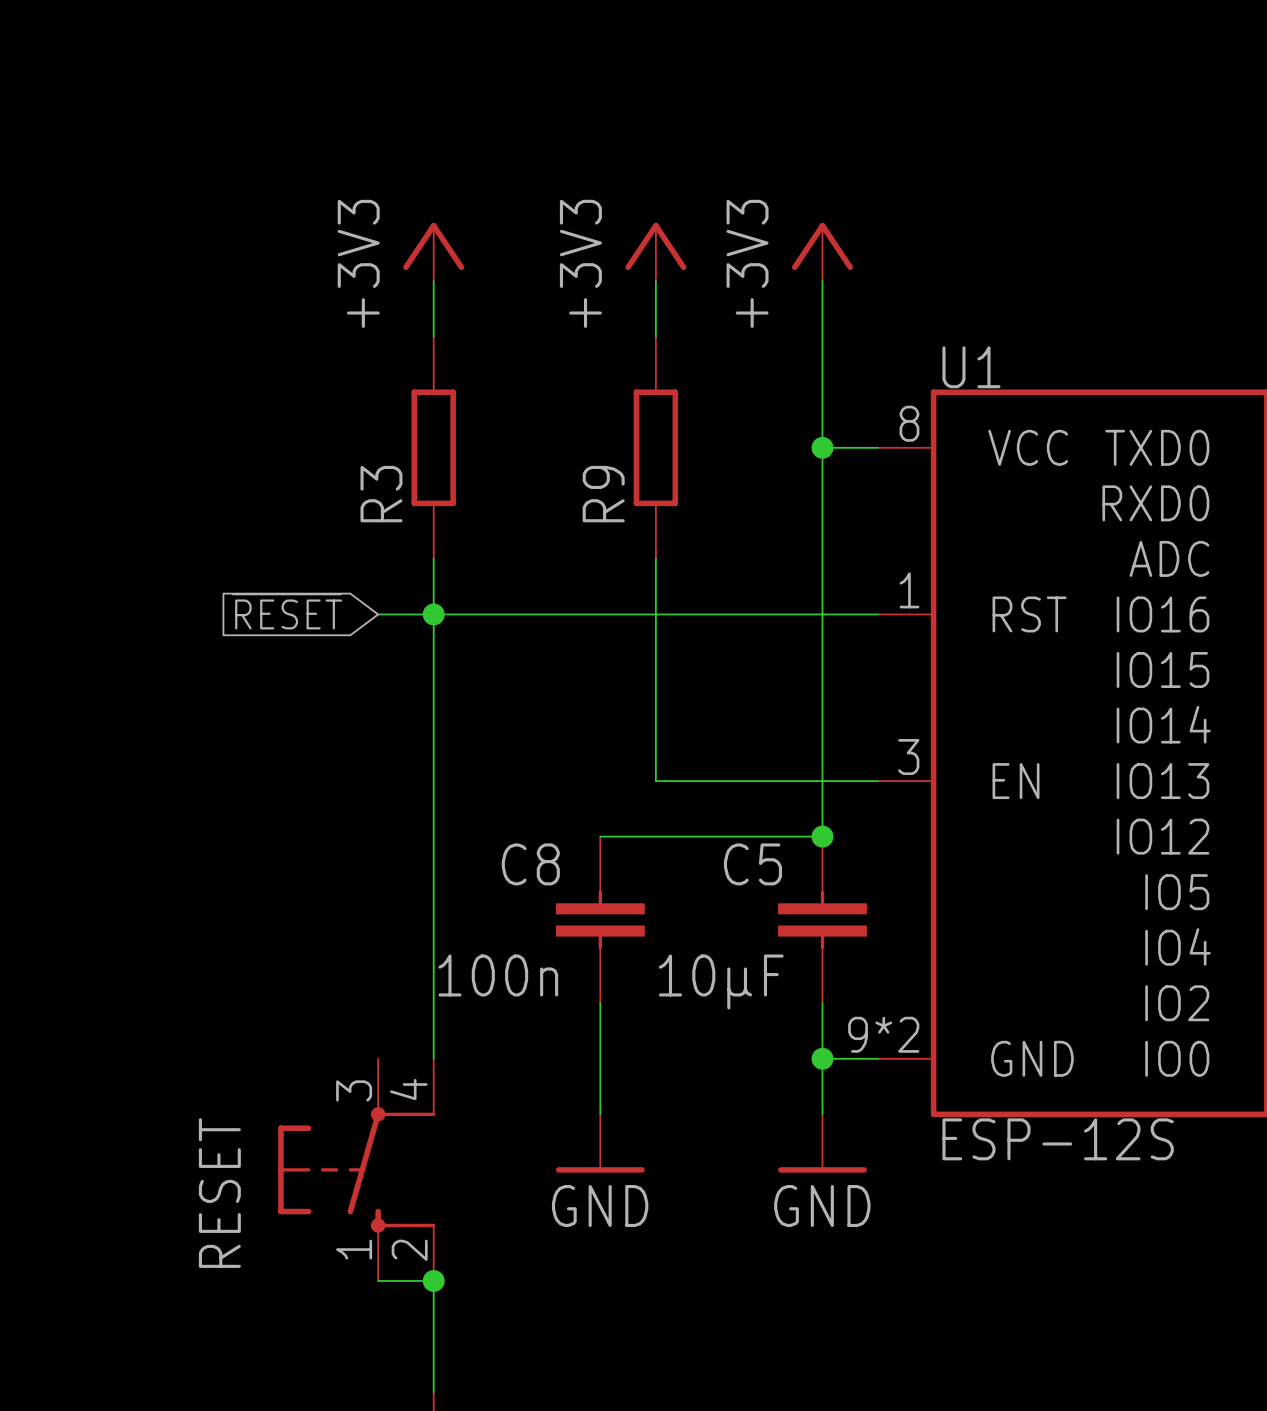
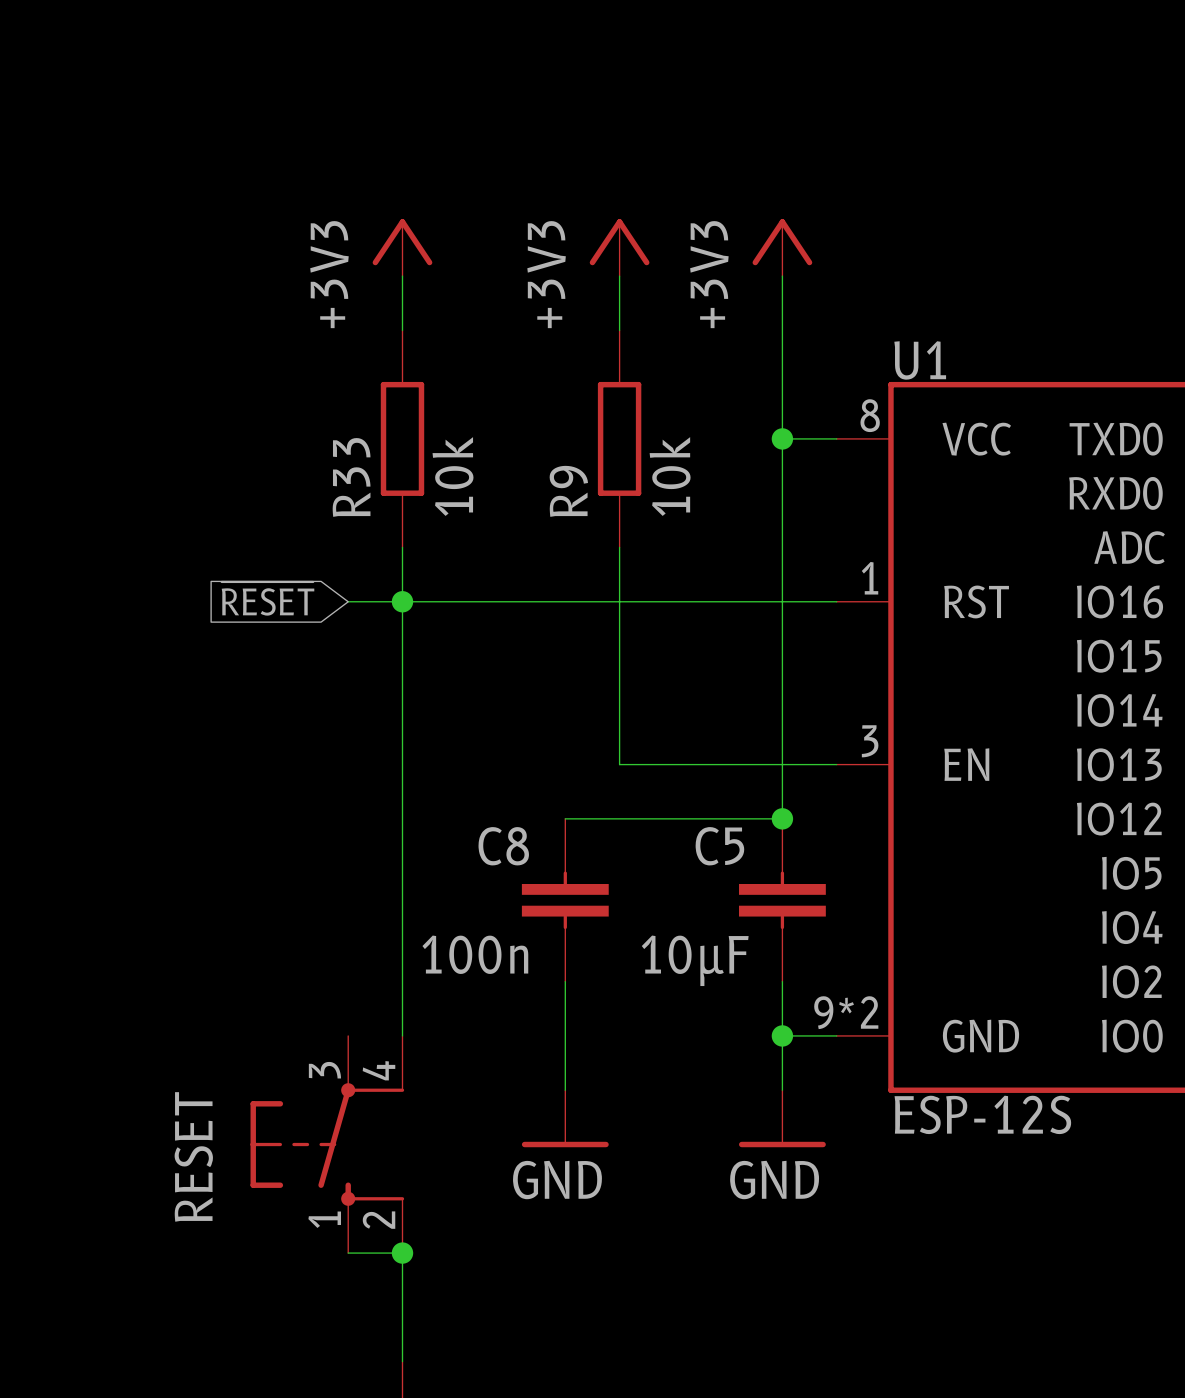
R3 value: none -> 10k (453, 476)
R9 value: none -> 10k (670, 476)
R3 name: R3 (381, 494) -> R33 (351, 477)

